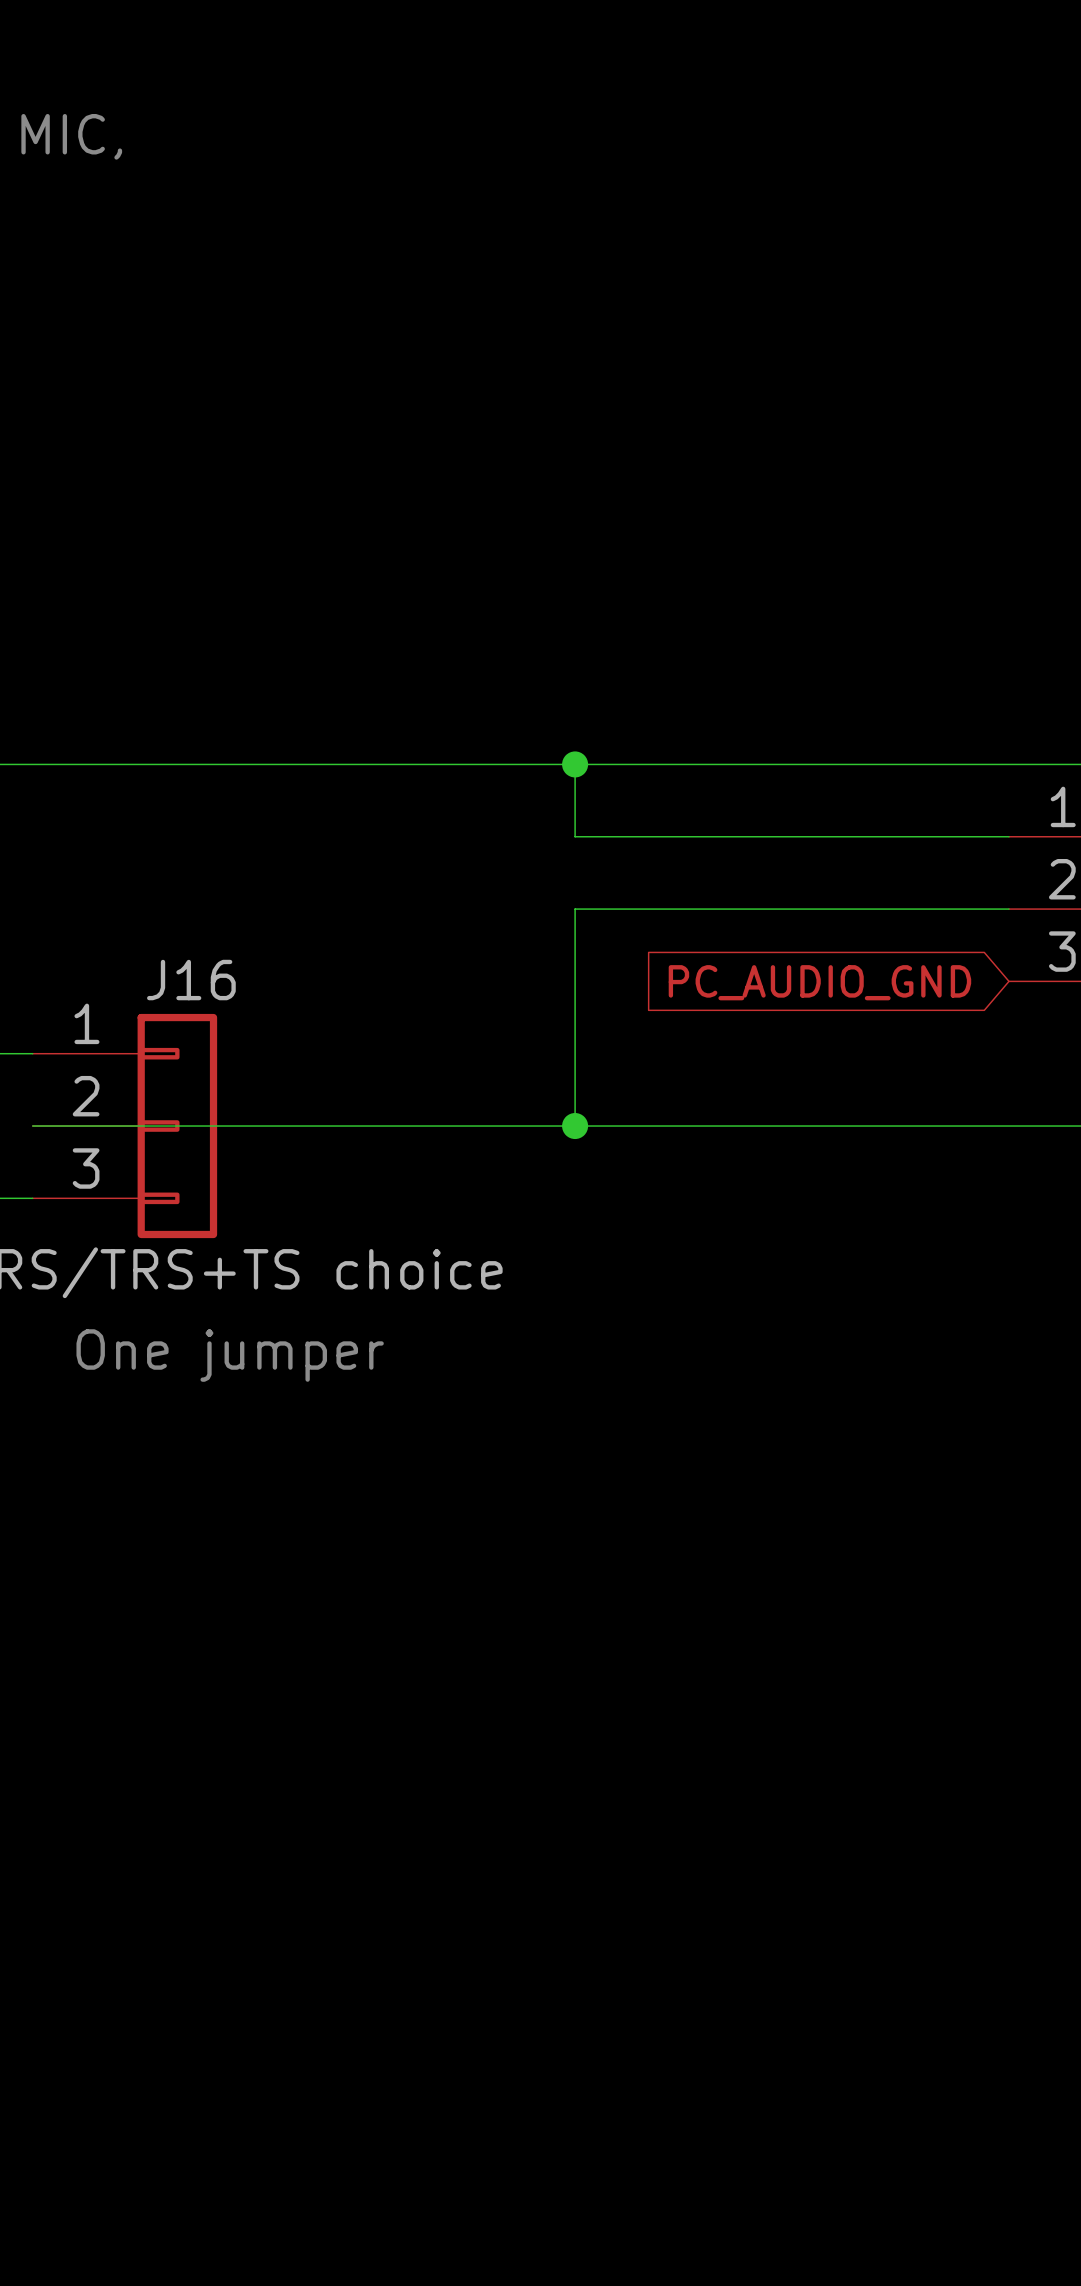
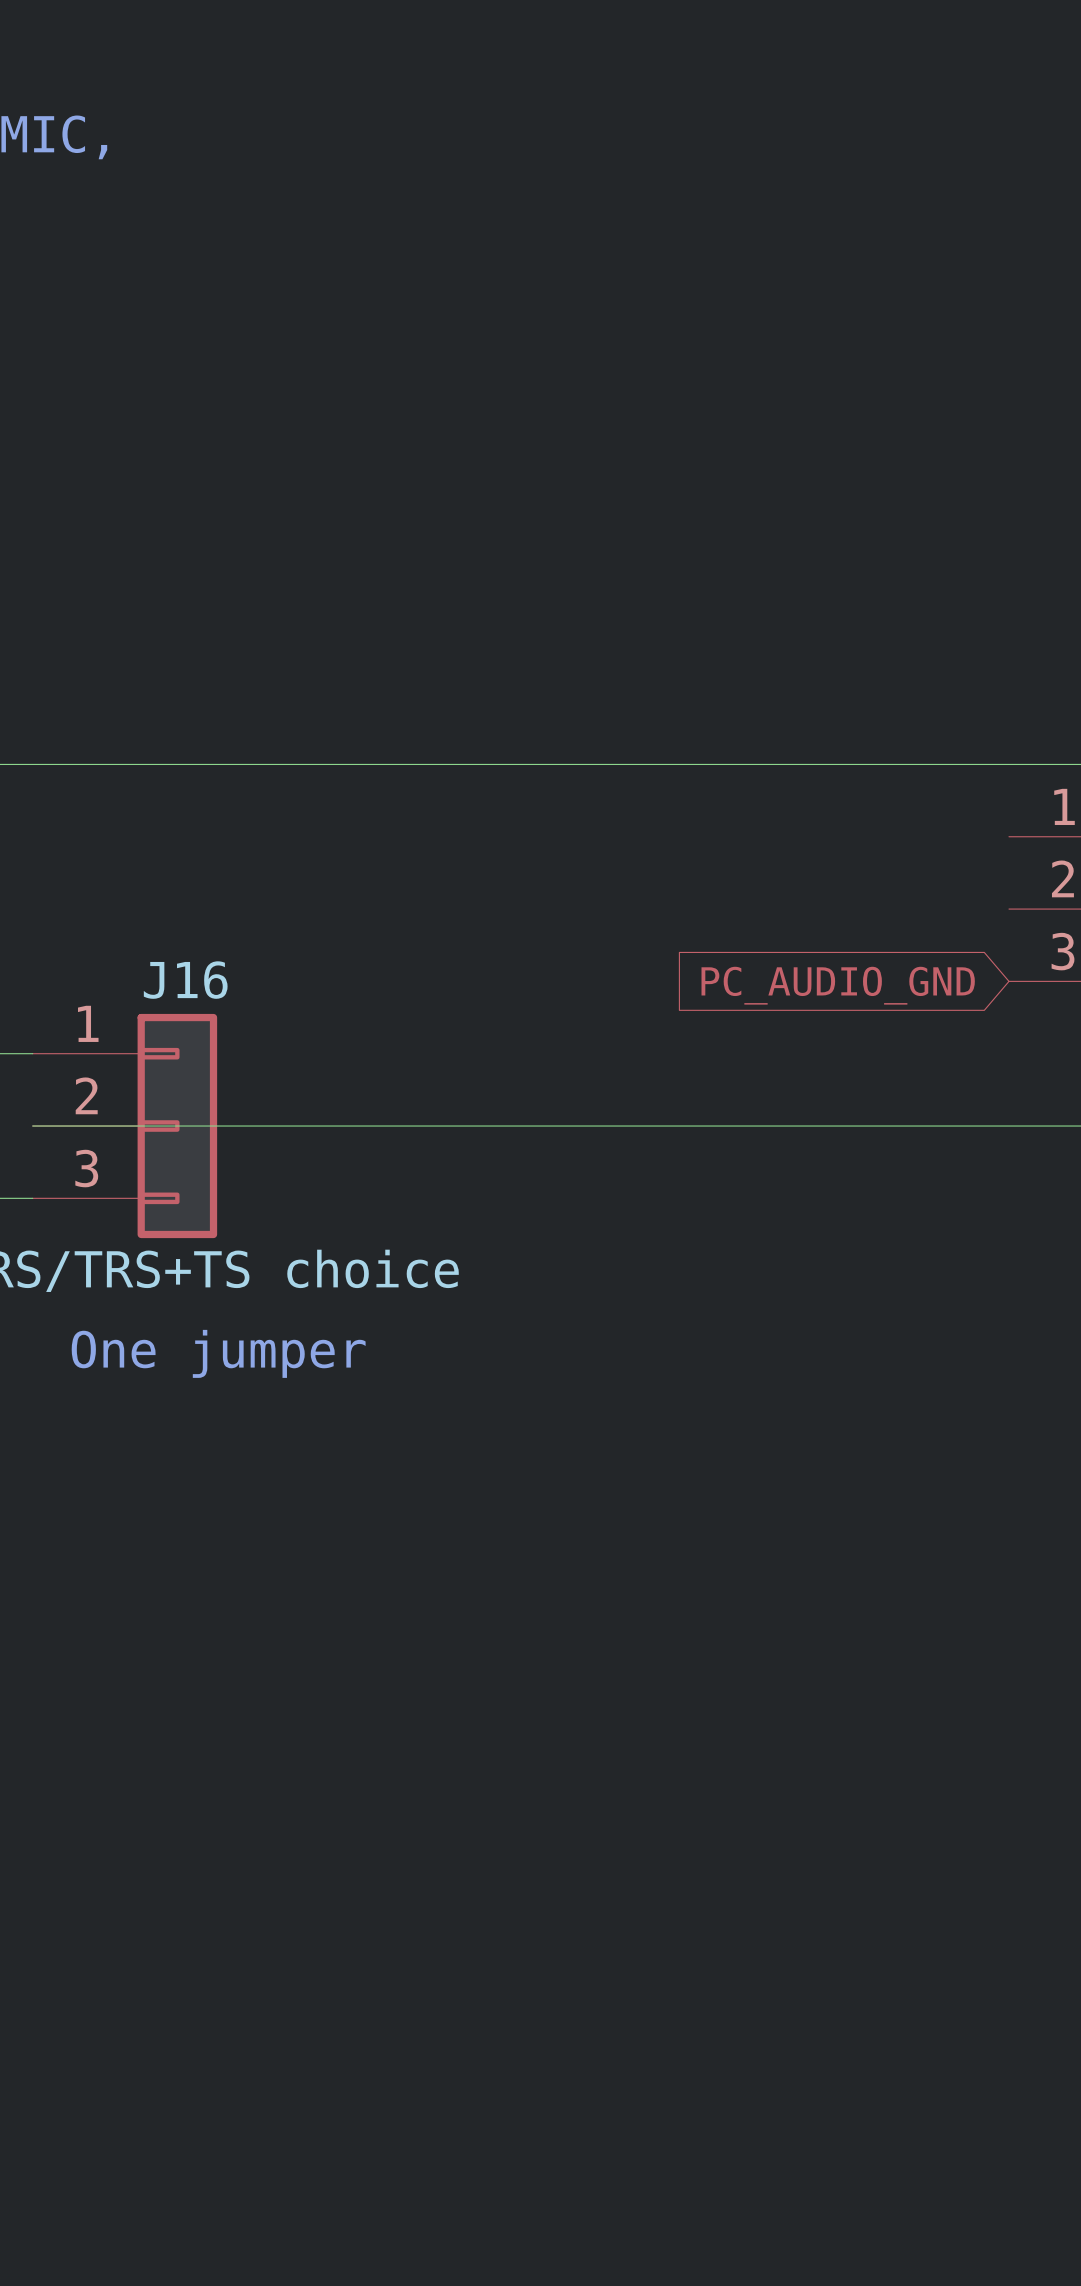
wire: (575, 764) (575, 836) (1008, 836) -> none
junction: (575, 764) -> none
wire: (1008, 909) (575, 909) (575, 1126) -> none
junction: (575, 1126) -> none

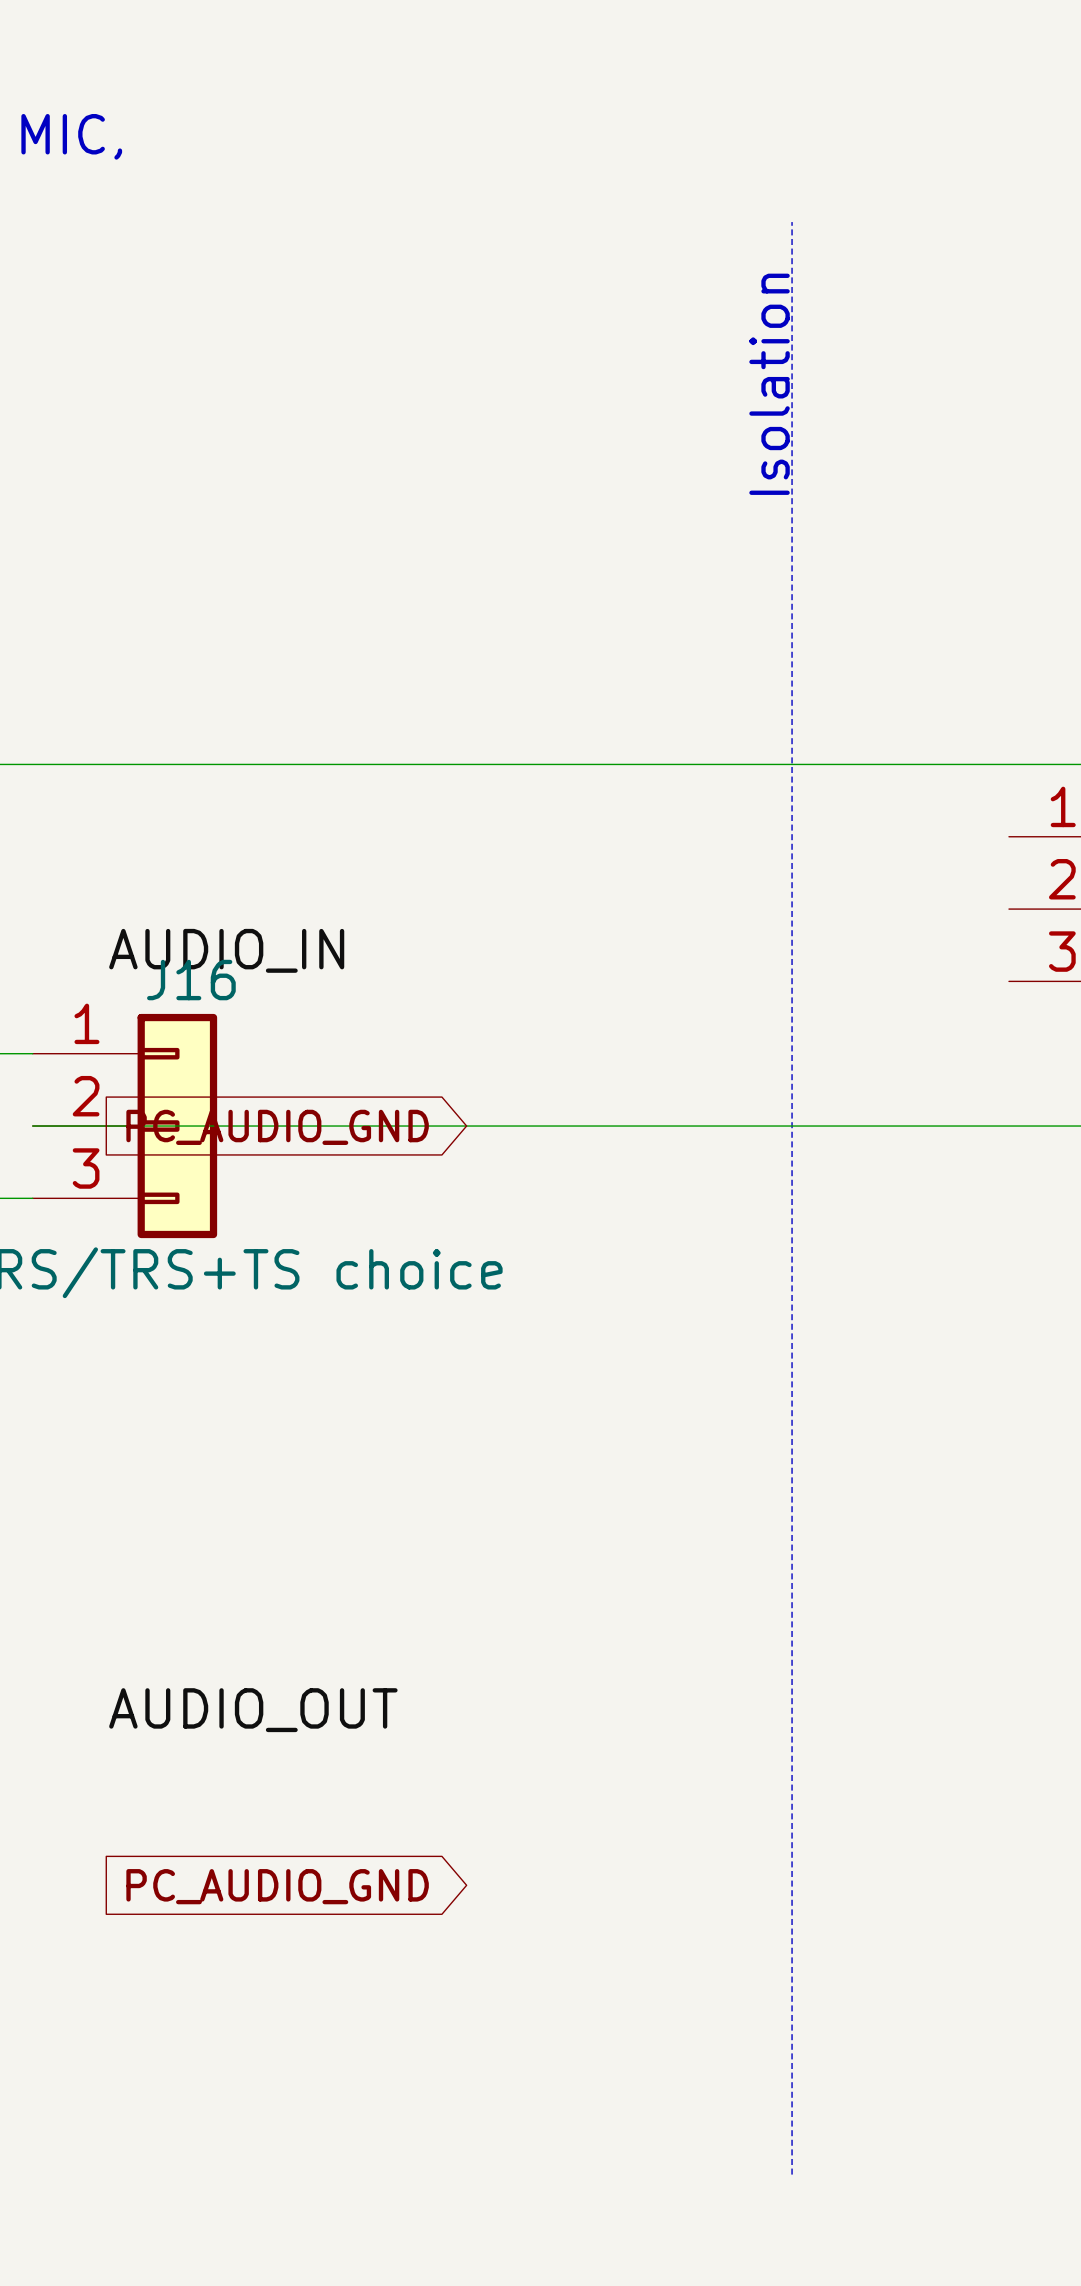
line: none -> (792, 222) (792, 2174)
text: none -> Isolation (769, 384)
label: none -> AUDIO_IN (226, 950)
global label: PC_AUDIO_GND (838, 985) -> none
global label: none -> PC_AUDIO_GND (277, 1127)
text: One jumper (218, 1353) -> none
label: none -> AUDIO_OUT (253, 1710)
global label: none -> PC_AUDIO_GND (277, 1886)

